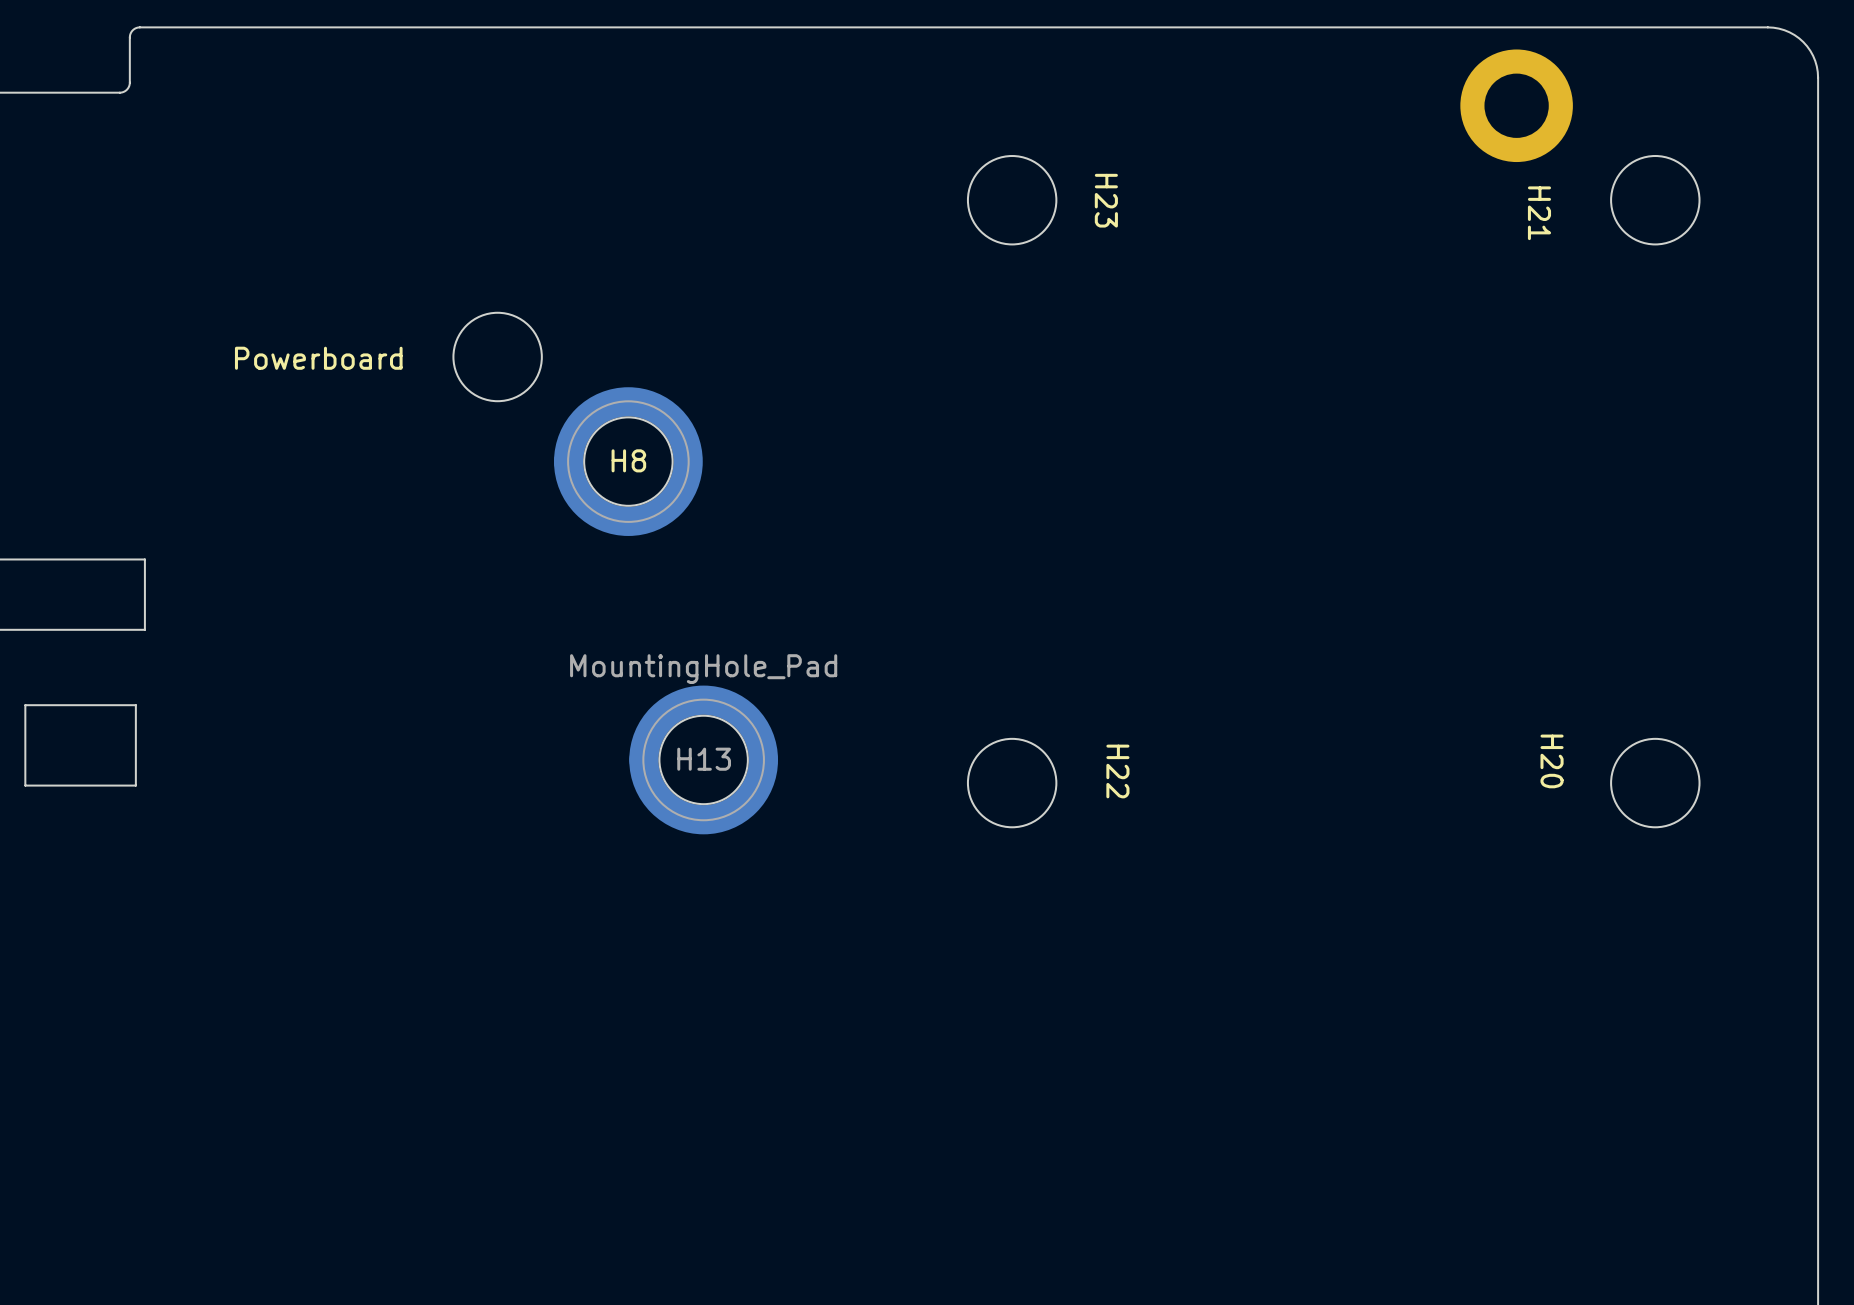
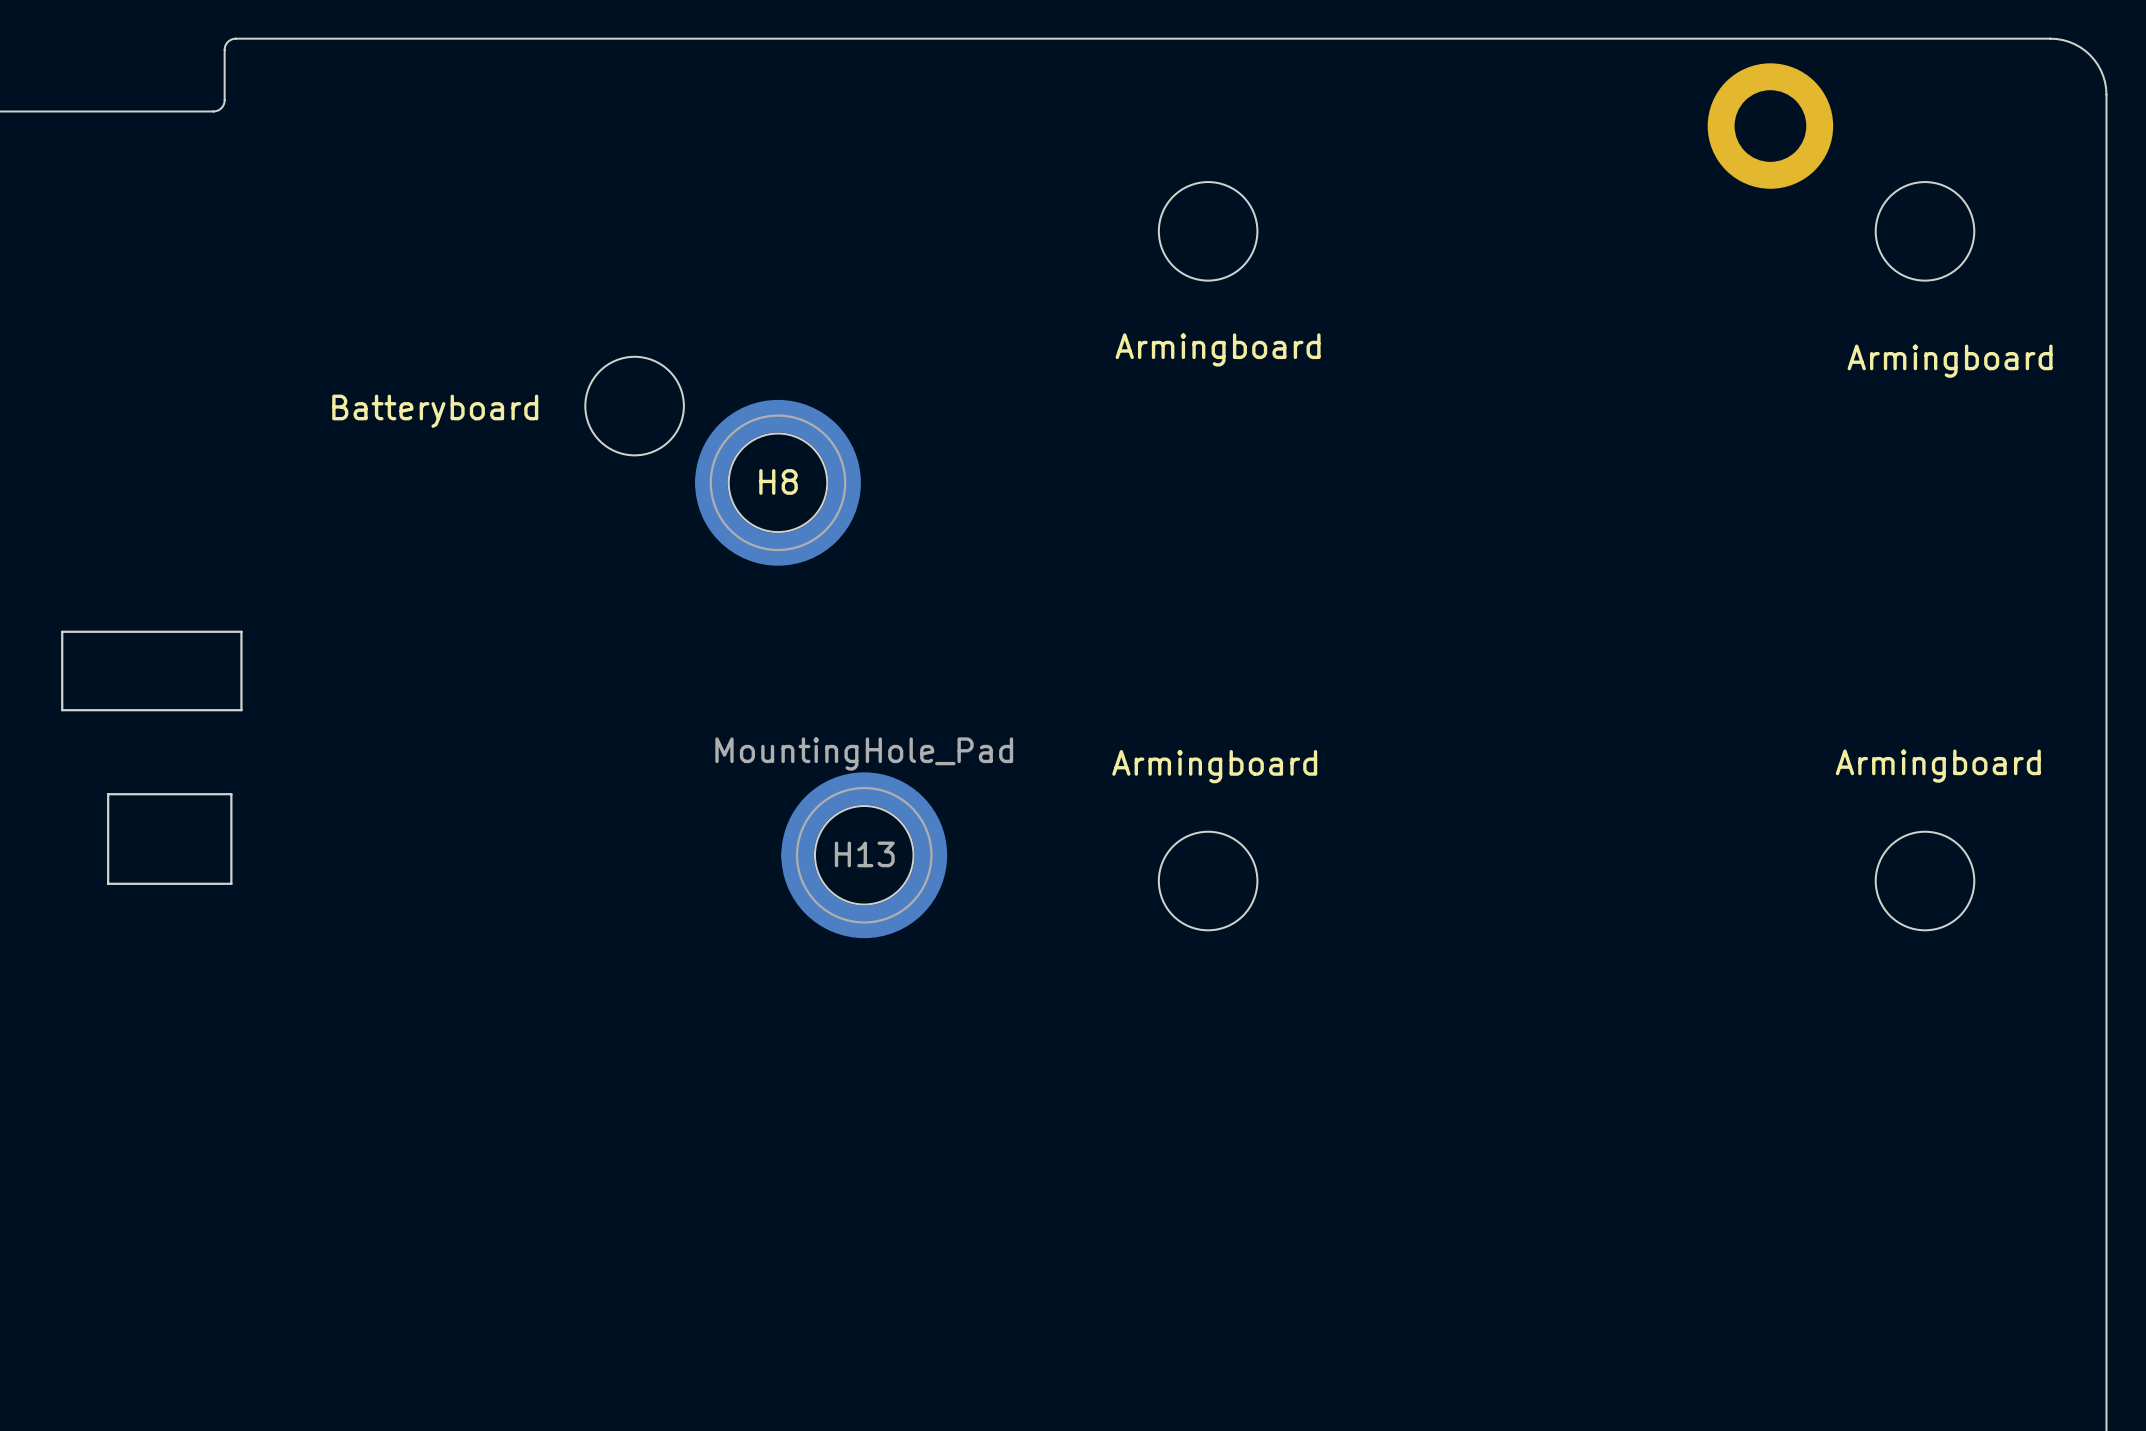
H23 name: H23 (1106, 200) -> none
H21 name: H21 (1539, 213) -> none
text: none -> Armingboard (1218, 349)
text: none -> Armingboard (1950, 361)
part text: Powerboard (318, 358) -> Batteryboard (435, 411)
H8 position: (628, 461) -> (777, 482)
text: none -> Armingboard (1938, 766)
text: none -> Armingboard (1214, 766)
H20 name: H20 (1552, 761) -> none
H22 name: H22 (1117, 771) -> none

